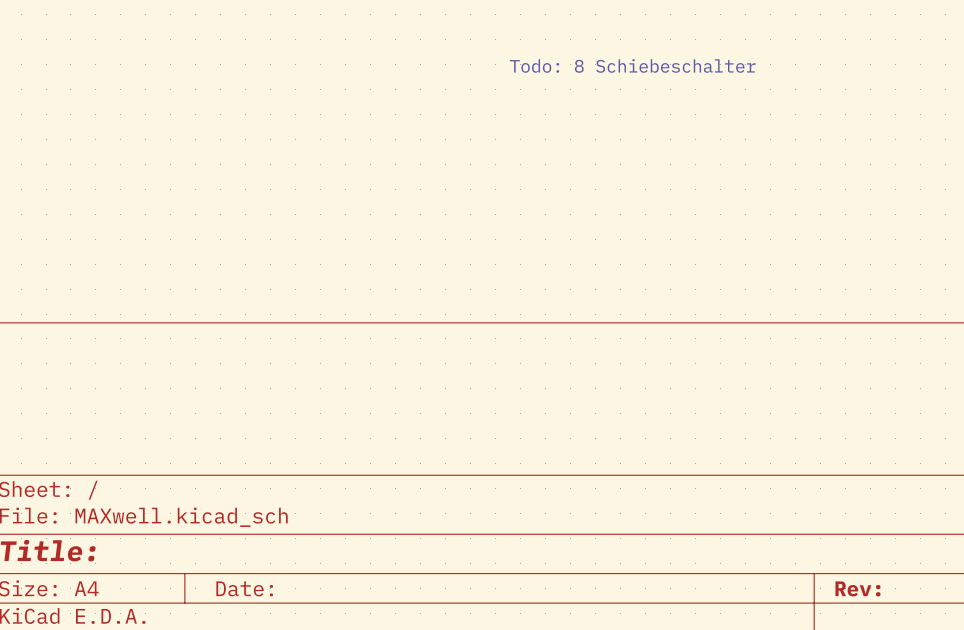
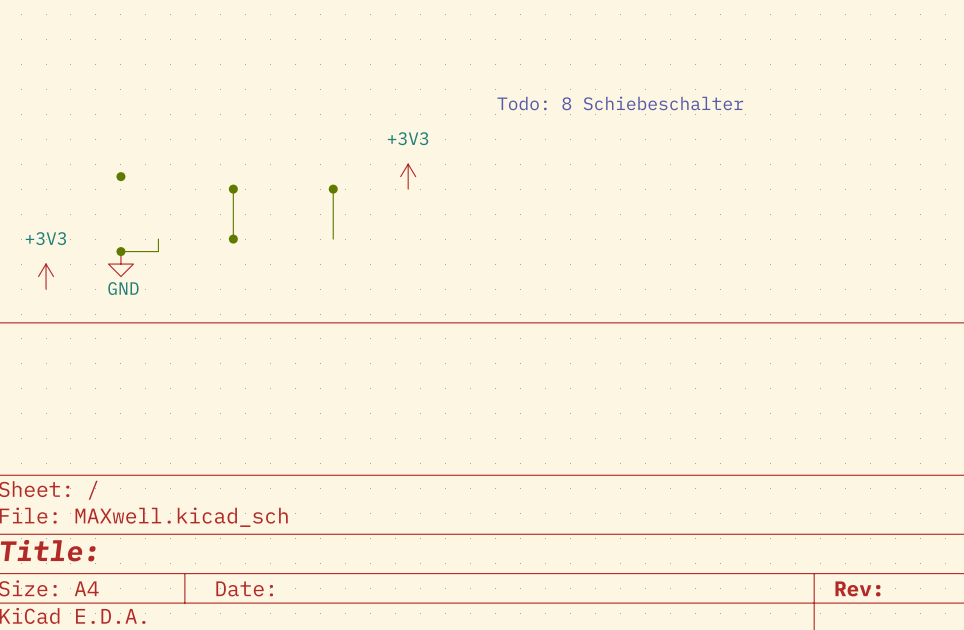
text position: Todo: 8 Schiebeschalter (632, 65) -> Todo: 8 Schiebeschalter (620, 103)
junction: none -> (120, 176)
power symbol: none -> +3V3 (408, 176)
wire: none -> (233, 189) (233, 239)
junction: none -> (233, 189)
wire: none -> (333, 189) (333, 239)
junction: none -> (333, 189)
wire: none -> (158, 239) (158, 251) (120, 251)
junction: none -> (233, 239)
junction: none -> (120, 251)
power symbol: none -> GND (120, 264)
power symbol: none -> +3V3 (46, 276)

